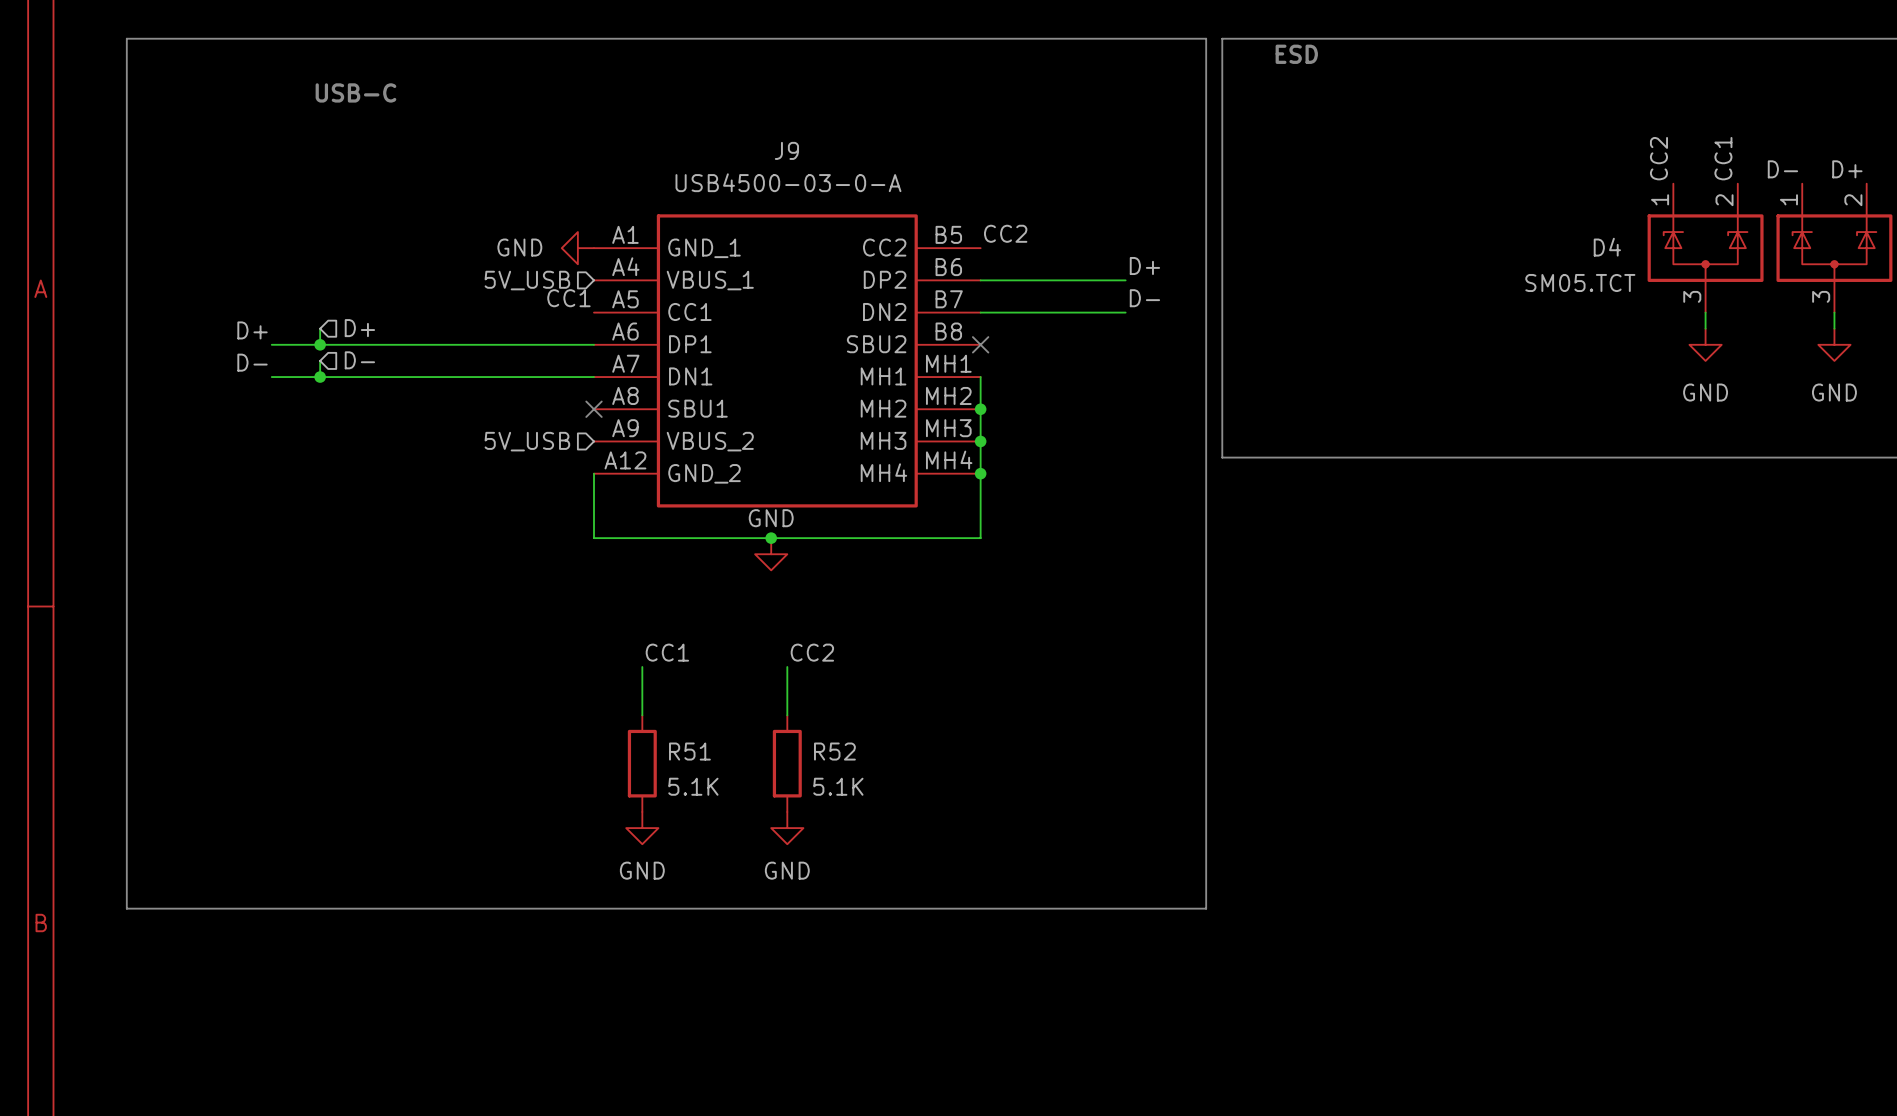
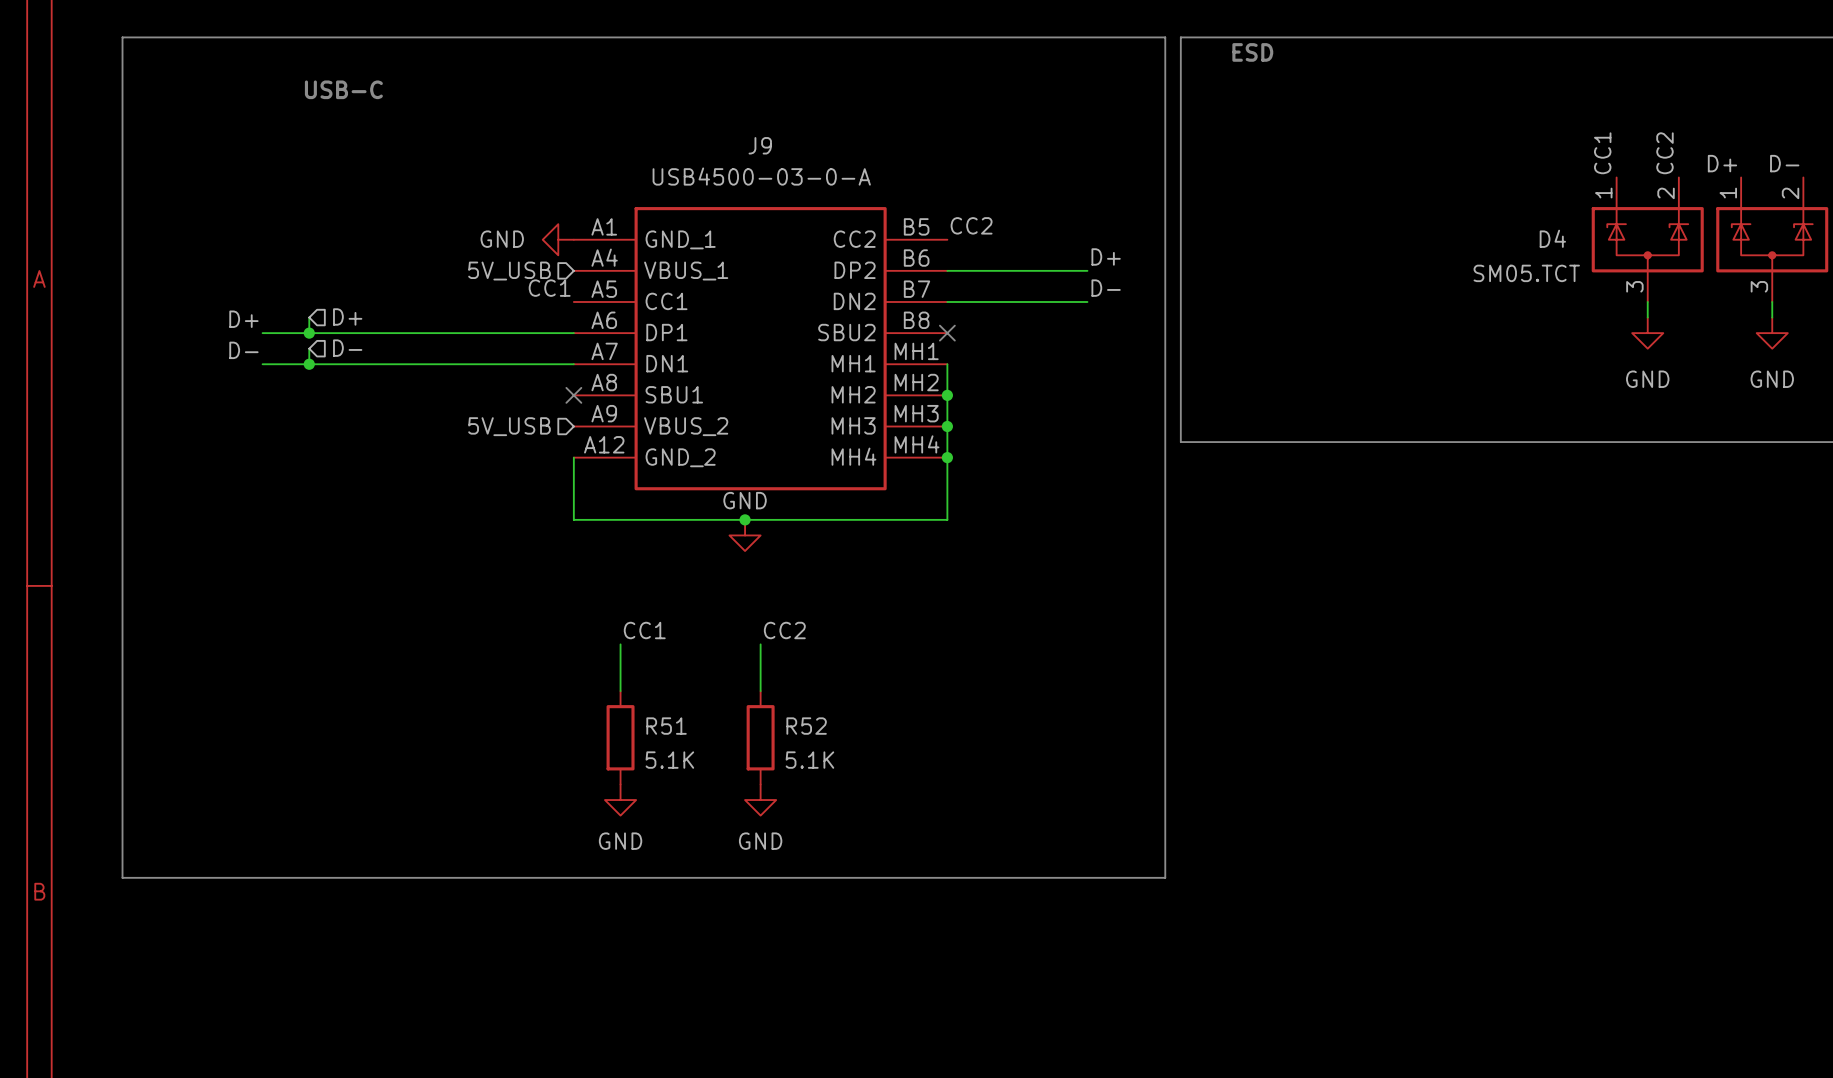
label: CC2 (1658, 158) -> CC1 (1602, 153)
label: CC1 (1723, 158) -> CC2 (1664, 153)
label: D- (1782, 169) -> D+ (1722, 163)
label: D+ (1847, 169) -> D- (1784, 163)

